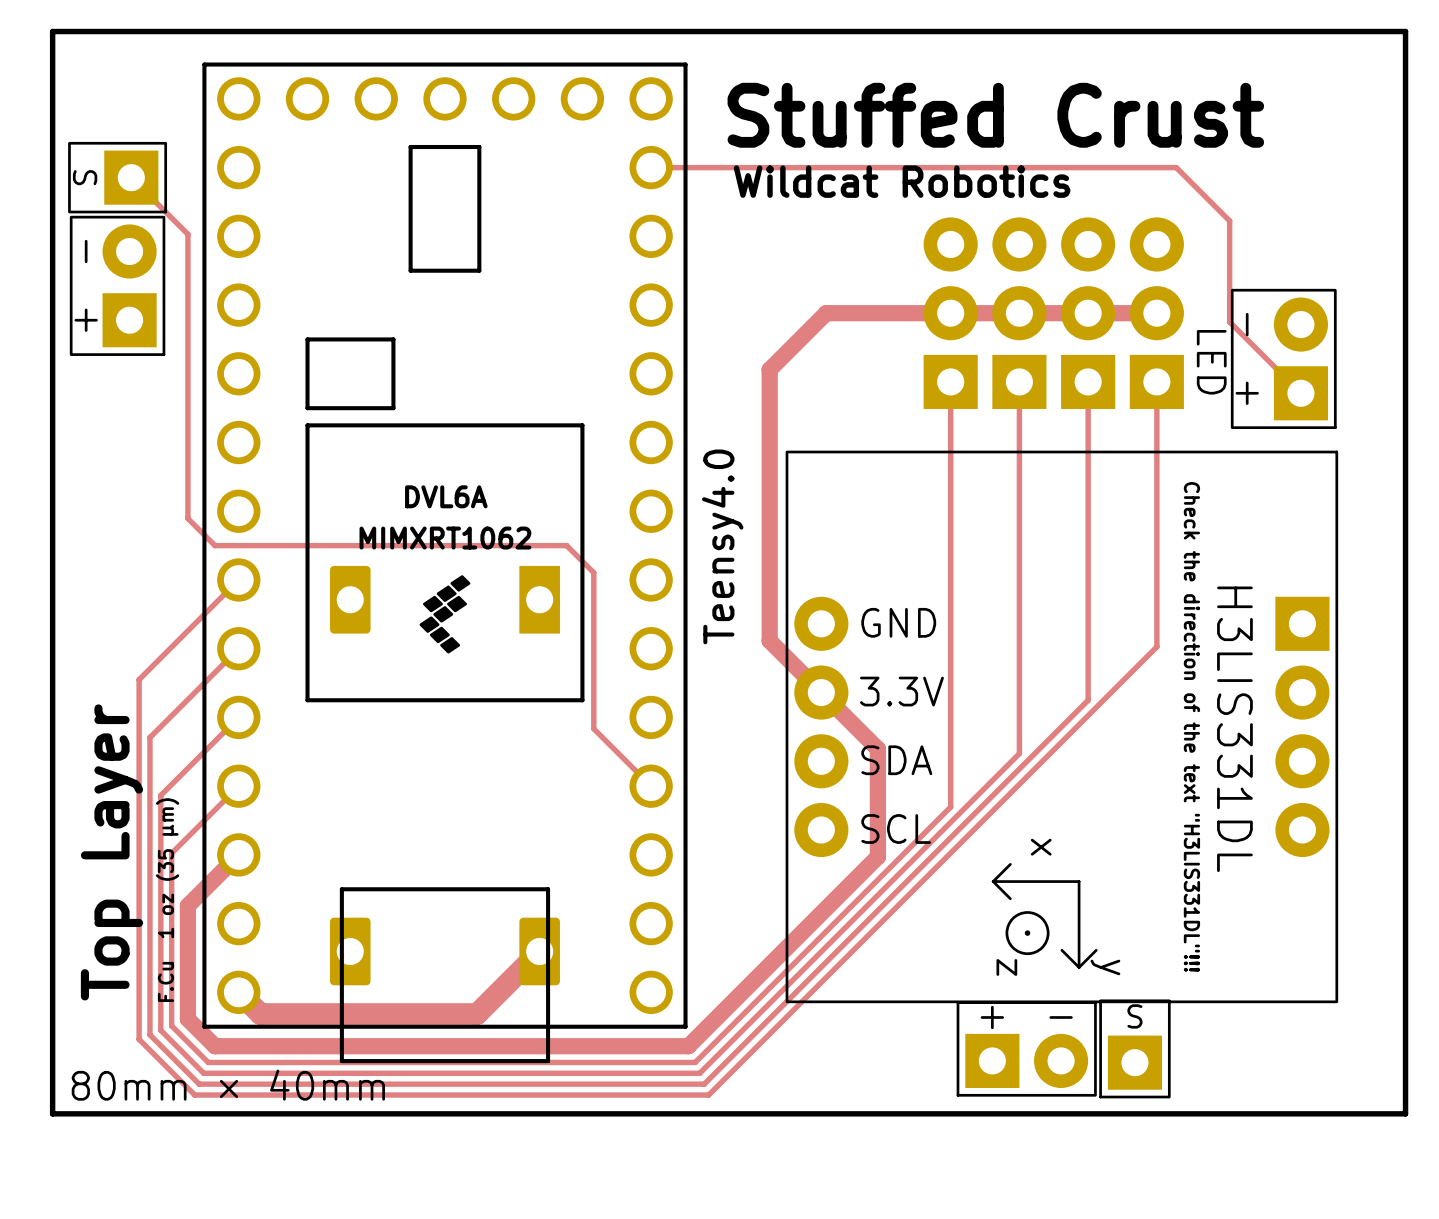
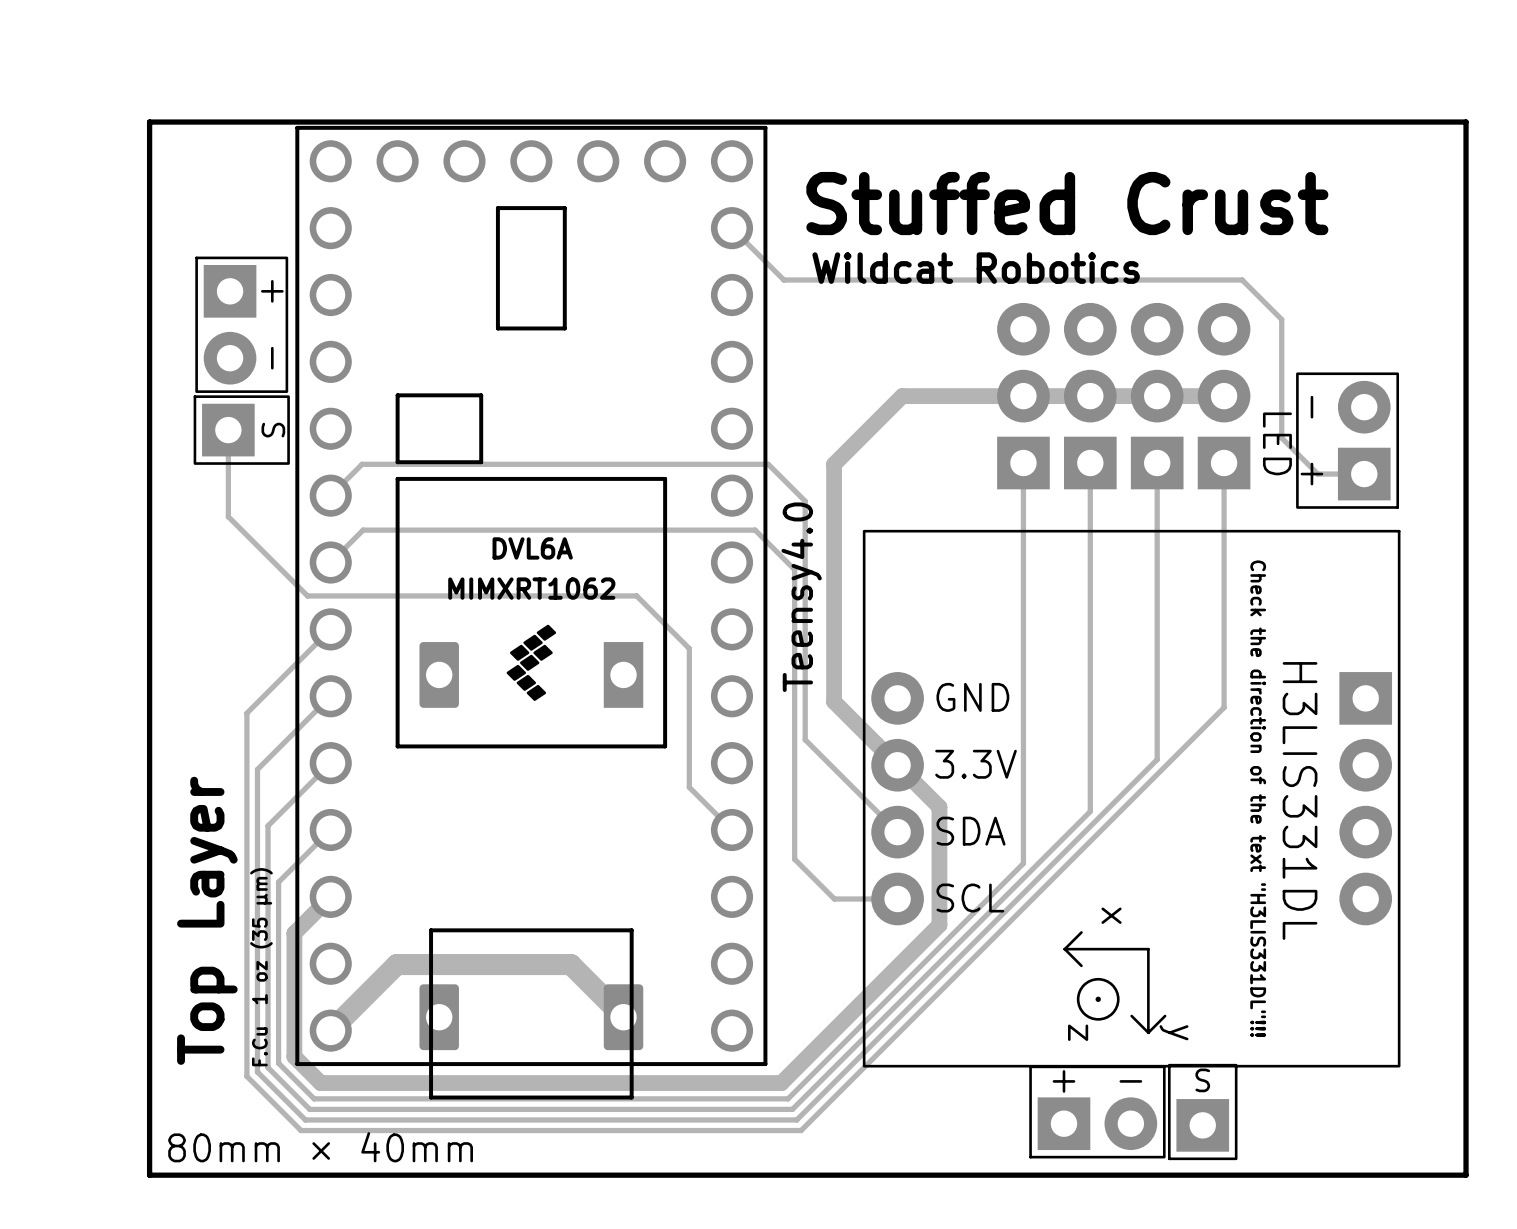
track: (651, 167) (1176, 167) (1229, 220) (1229, 321) (1300, 393) -> (731, 228) (783, 280) (1242, 280) (1281, 319) (1281, 437) (1317, 474) (1364, 474)
part rotation: 0° (117, 177) -> 180° (241, 430)
part position: (117, 177) -> (241, 430)
track: (131, 177) (187, 234) (187, 518) (214, 545) (566, 545) (593, 572) (593, 728) (651, 786) -> none
part rotation: 0° (117, 285) -> 180° (241, 324)
track: none -> (228, 430) (228, 516) (307, 595) (636, 595) (689, 648) (689, 787) (731, 830)
track: (769, 369) (769, 640) -> (847, 451) (834, 464) (834, 701) (847, 714)
track: none -> (330, 495) (362, 464) (768, 464) (805, 501) (805, 739) (897, 832)
track: none -> (330, 562) (363, 530) (755, 530) (794, 569) (794, 859) (834, 899) (897, 899)
part position: (444, 562) -> (531, 612)
track: (238, 579) (139, 679) (139, 1039) (194, 1095) (708, 1095) (1156, 646) (1156, 633) -> (330, 629) (246, 713) (246, 1076) (301, 1130) (801, 1130) (1224, 707)
track: (238, 648) (149, 737) (149, 1034) (199, 1084) (704, 1084) (1088, 700) (1088, 686) -> (330, 696) (257, 769) (257, 1072) (305, 1119) (796, 1119) (1157, 759)
track: (238, 717) (160, 795) (160, 1030) (203, 1073) (699, 1073) (1019, 753) (1019, 740) -> none
track: (864, 735) (877, 749) (877, 856) (688, 1046) -> (1090, 811) (792, 1109) (768, 1109)
track: none -> (939, 807) (939, 925) (781, 1083) (320, 1083) (294, 1056) (294, 933) (330, 896)
track: (238, 786) (171, 853) (171, 1025) (208, 1062) (695, 1062) (950, 807) (950, 793) -> (330, 830) (278, 882) (278, 1063) (314, 1098) (788, 1098) (1023, 863)
track: (238, 854) (187, 905) (187, 1019) (214, 1046) (217, 1046) -> (330, 763) (268, 825) (268, 1067) (309, 1109)
track: (539, 951) (477, 1014) (260, 1014) (238, 992) -> (623, 1017) (570, 964) (396, 964) (330, 1030)
track width: thick (214, 1046) (688, 1046) -> thin (307, 1109) (768, 1109)

